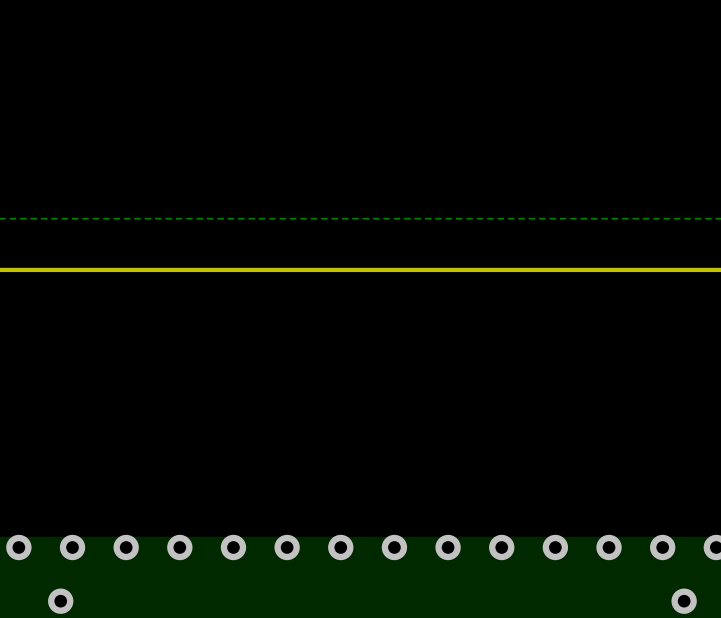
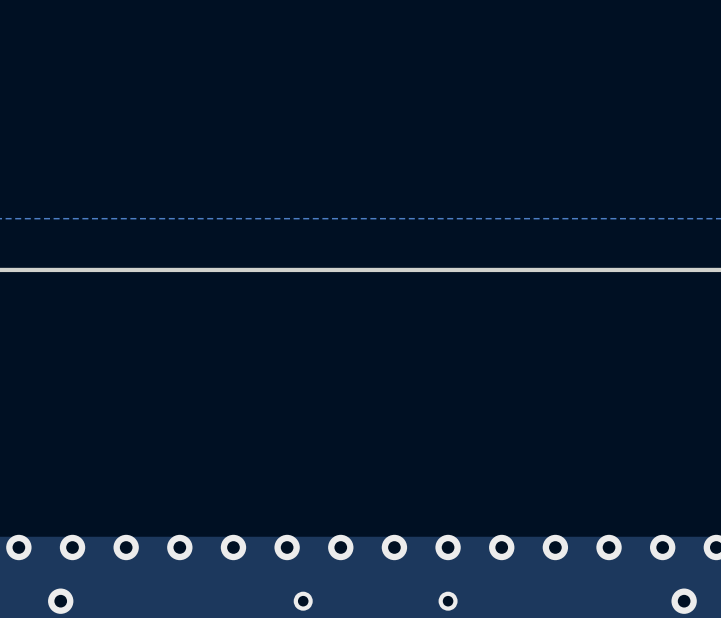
via: none -> (303, 601)
via: none -> (448, 601)

